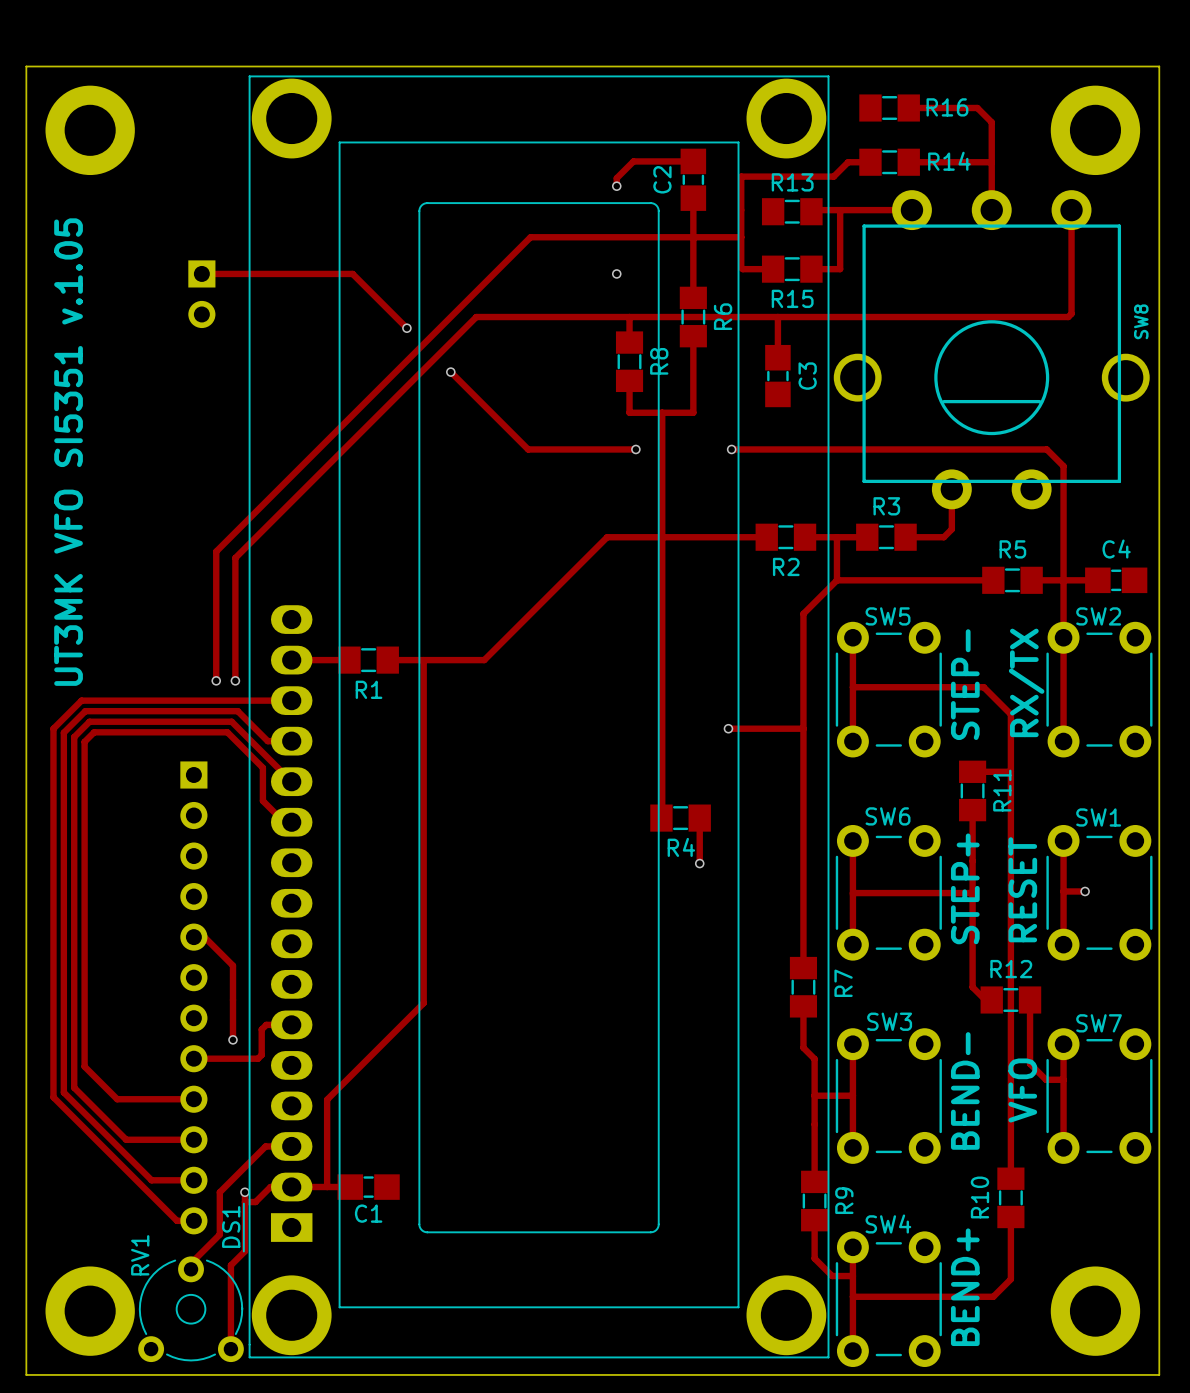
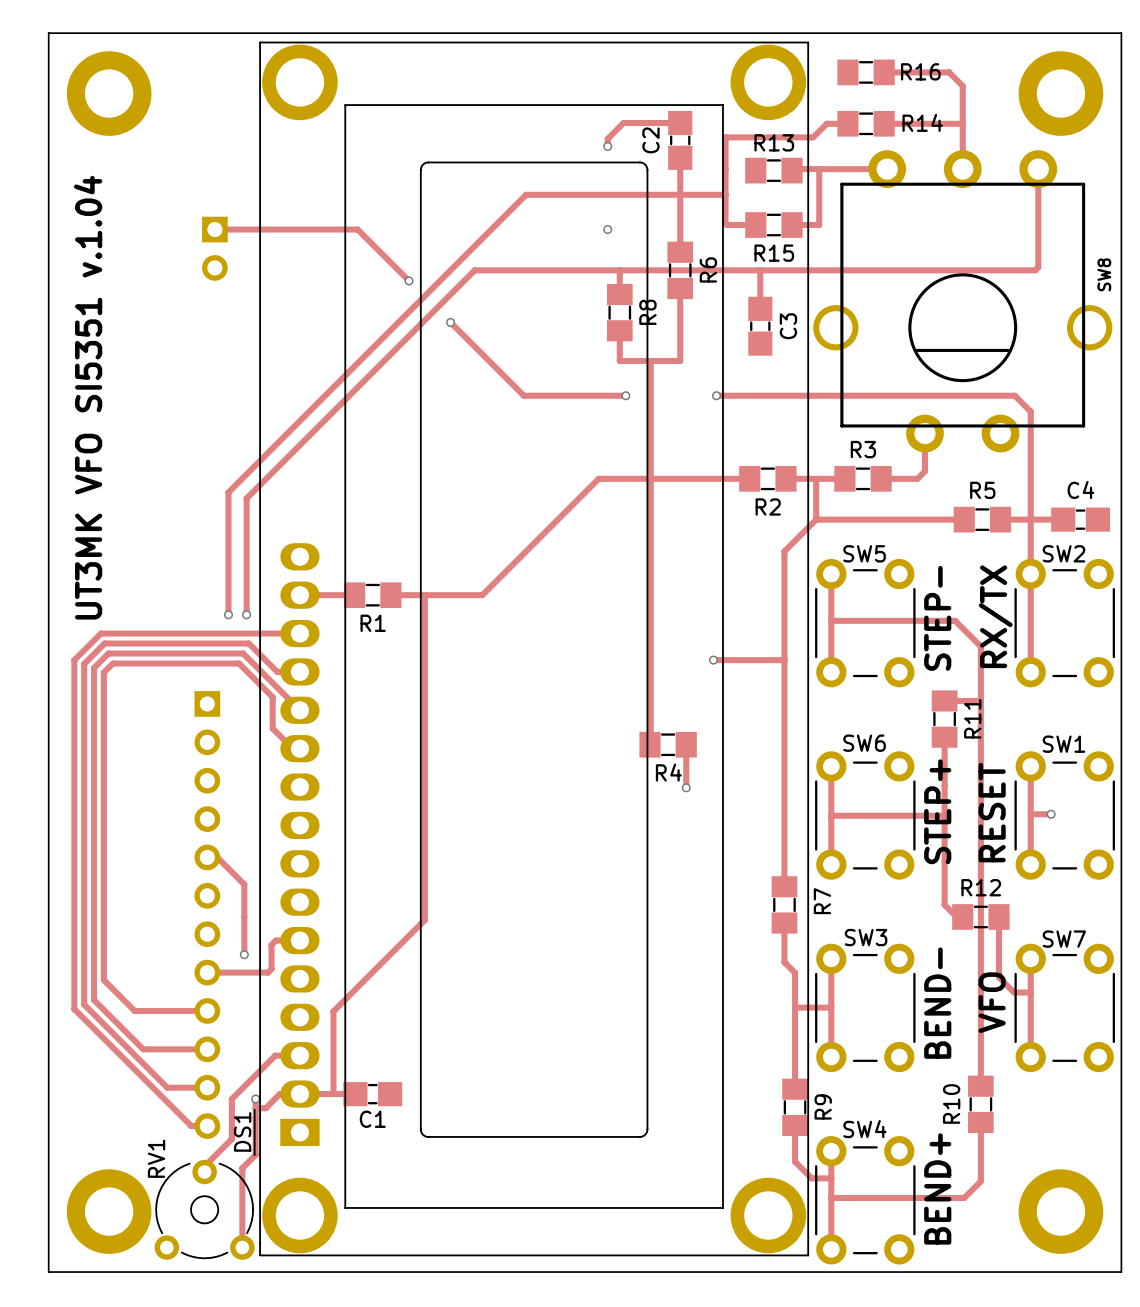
text: UT3MK VFO SI5351 v.1.05 (68, 452) -> UT3MK VFO SI5351 v.1.04 (88, 397)

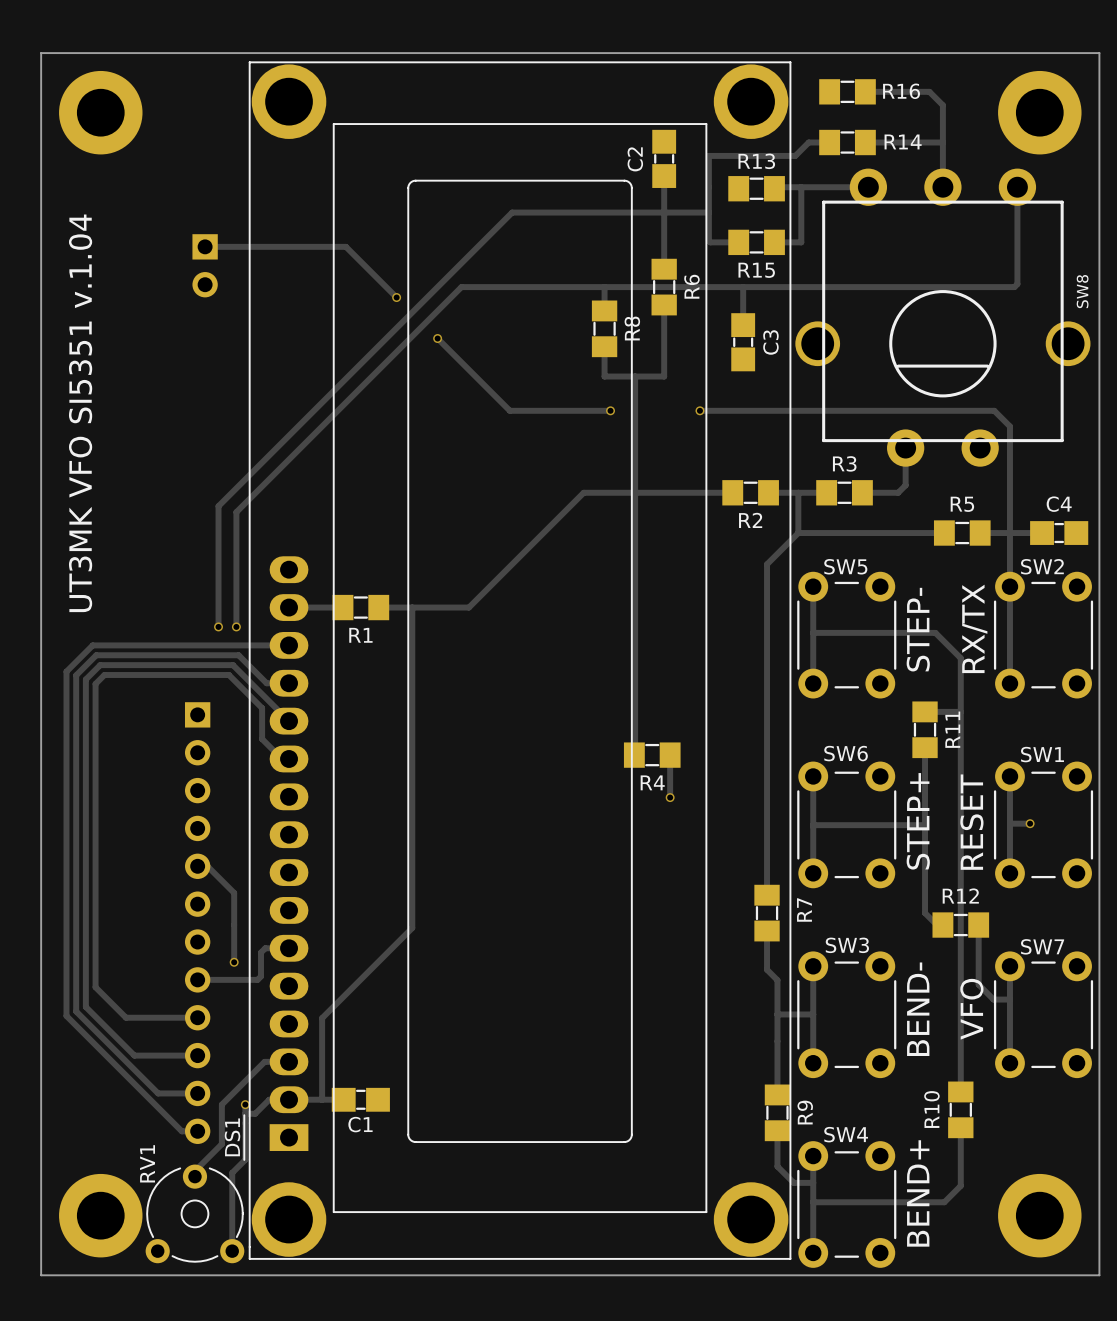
track: (680, 123) (623, 123) (607, 138) (607, 146) -> none
via: (607, 146) -> none
via: (607, 229) -> none
track: (713, 660) (784, 660) -> none
via: (713, 660) -> none

